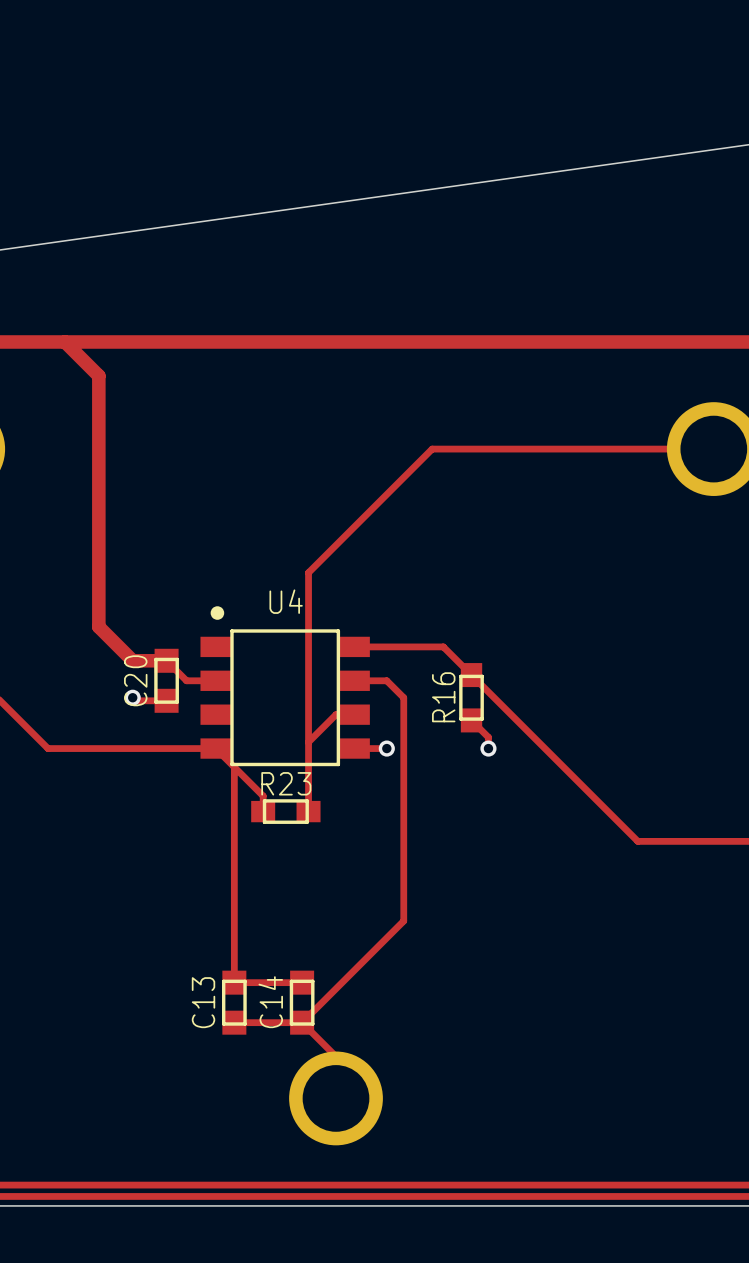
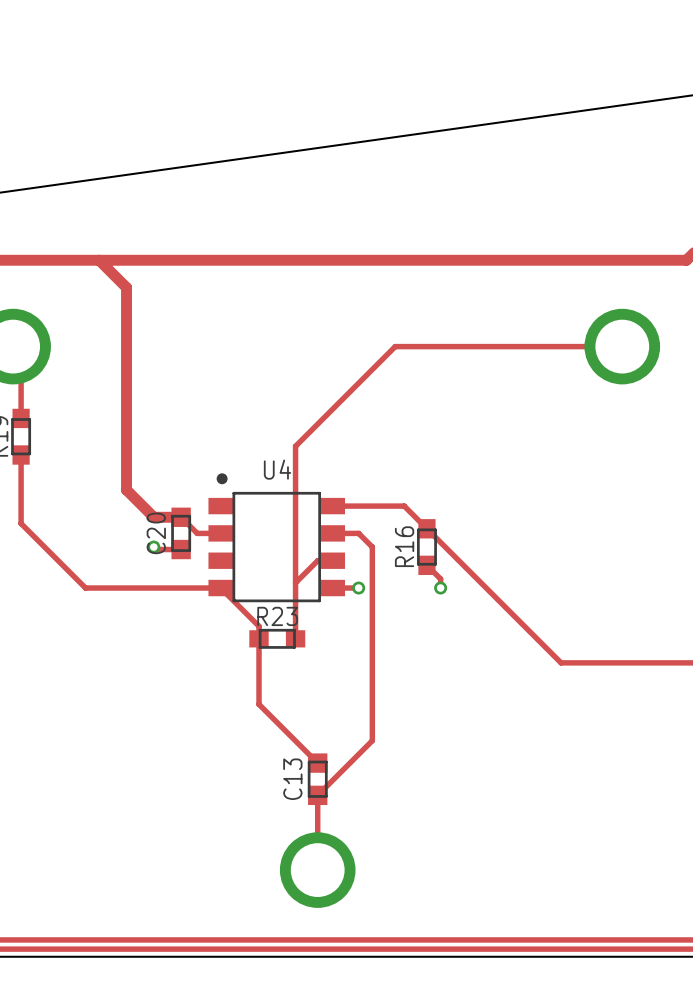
track: (234, 767) (234, 982) (302, 982) -> none
track: none -> (259, 638) (259, 704) (317, 763)
track: (403, 921) (302, 1022) -> (372, 727) (372, 740) (317, 795) (317, 836)
C13 position: (234, 1002) -> (317, 779)
C14: (302, 1002) -> none
track: (234, 1022) (302, 1022) -> none
track: (302, 1022) (336, 1056) -> none

